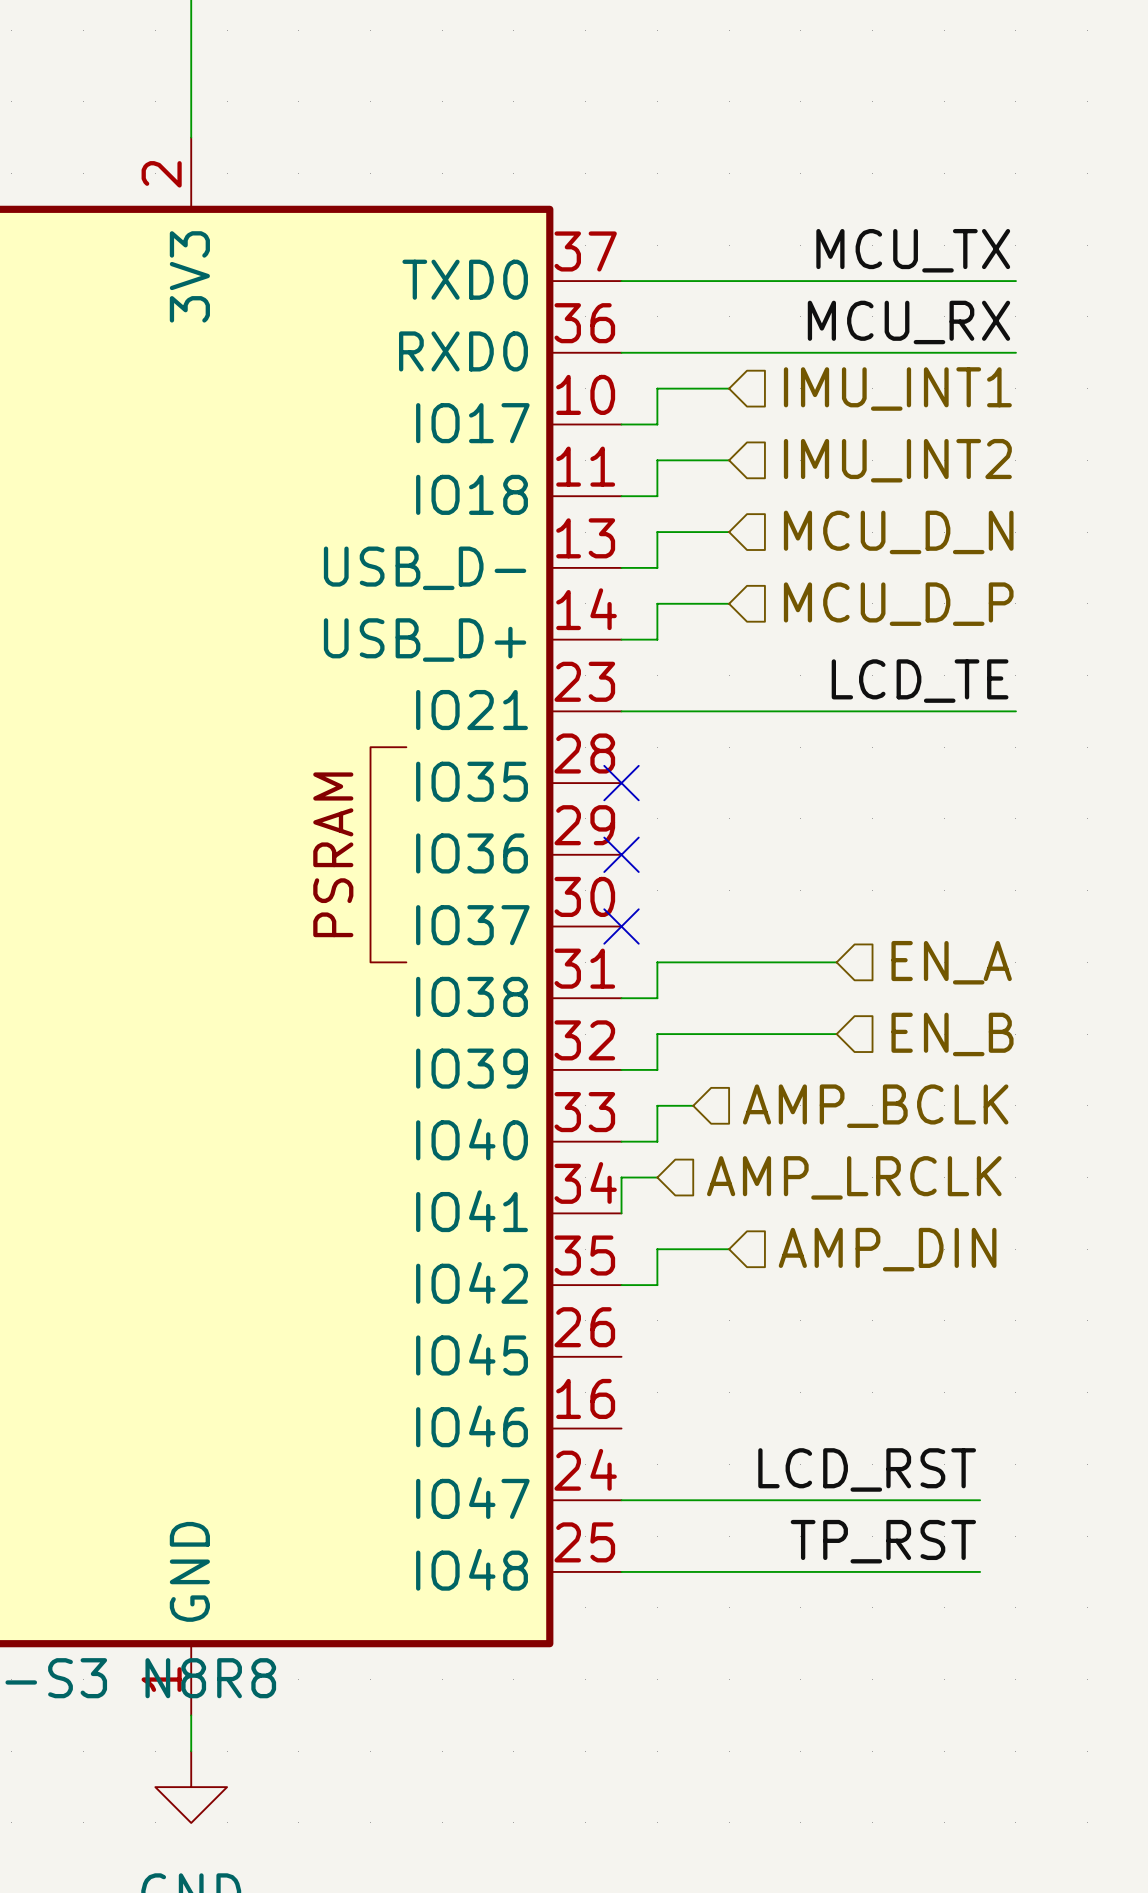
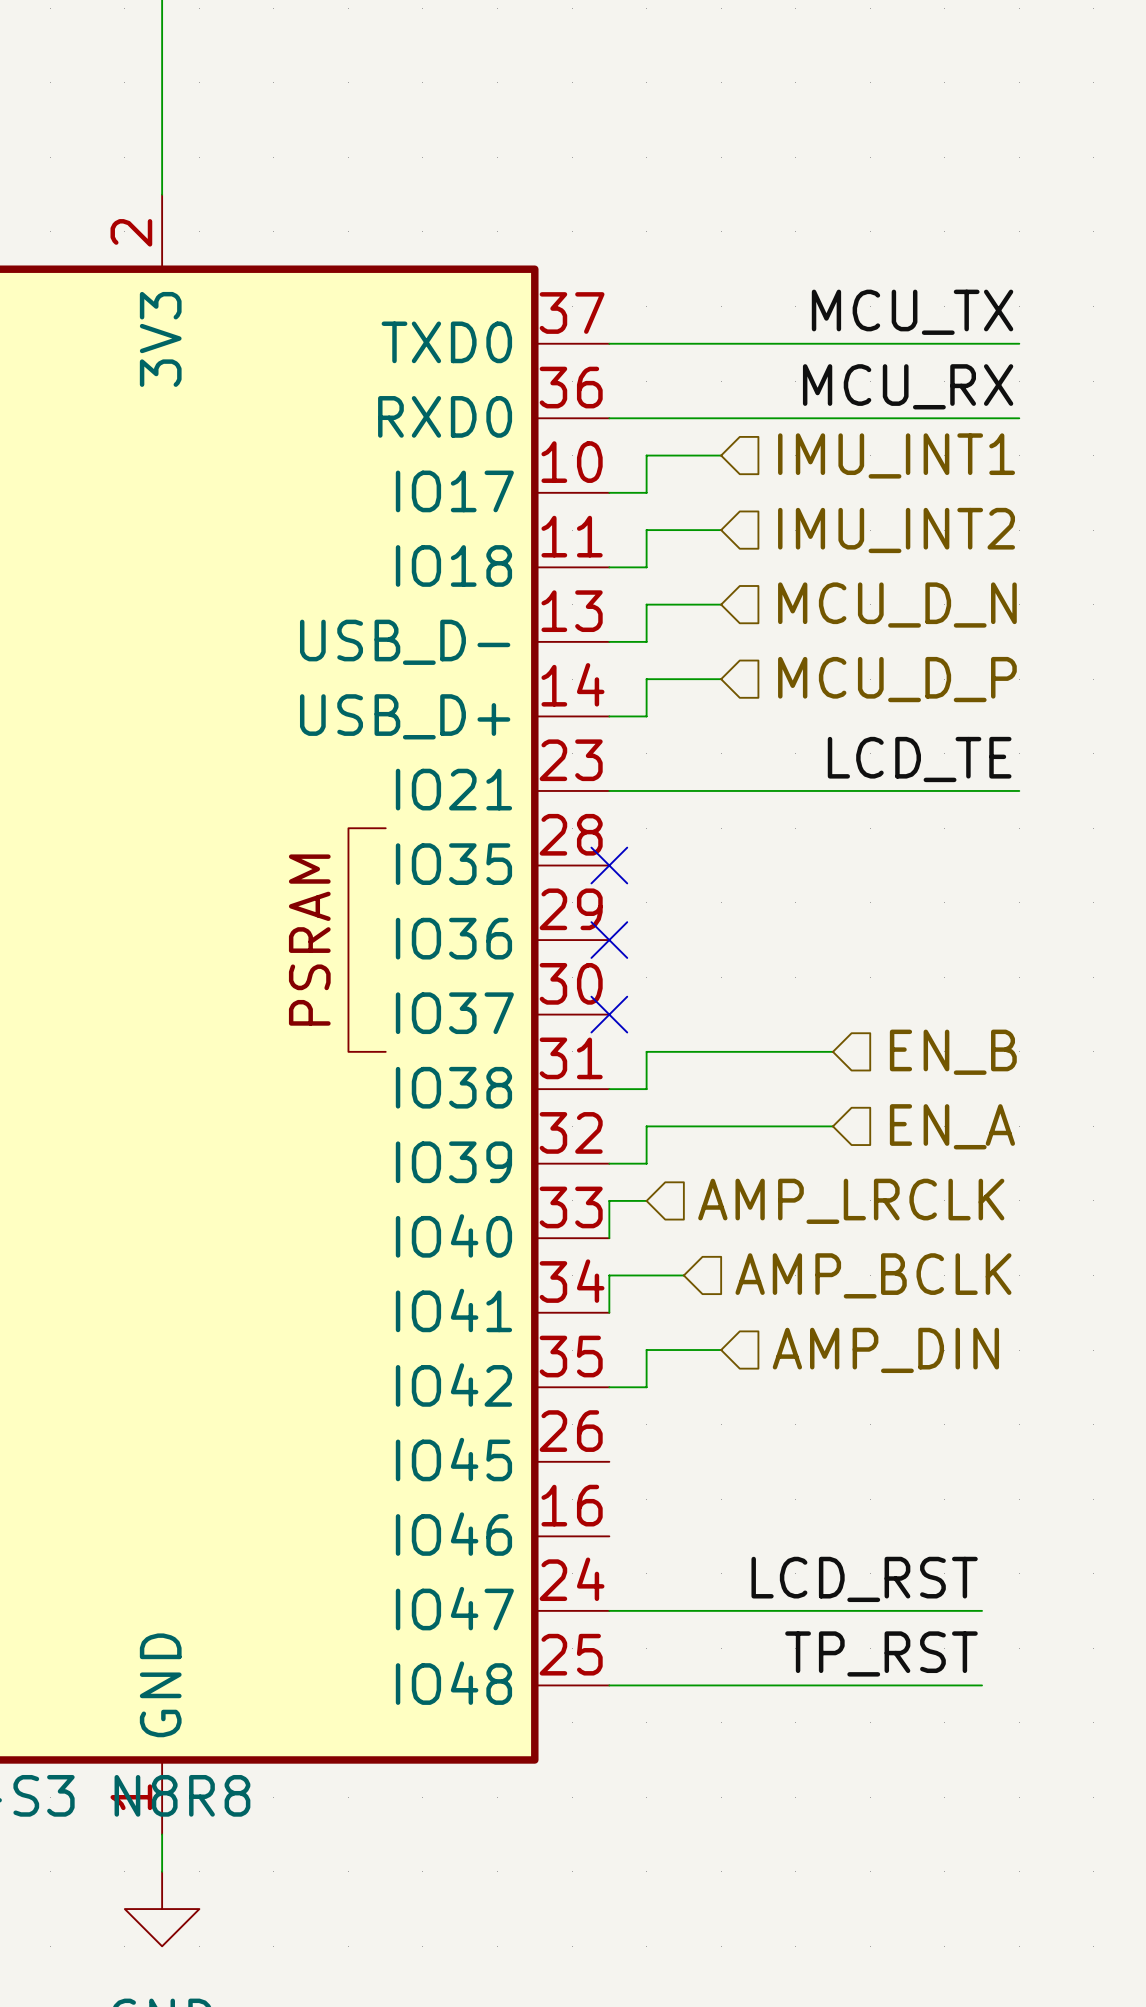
hierarchical label: EN_A (951, 962) -> EN_B (953, 1052)
hierarchical label: EN_B (952, 1034) -> EN_A (952, 1126)
wire: (693, 1105) (657, 1105) (657, 1141) (621, 1141) -> (646, 1200) (609, 1200) (609, 1238)
hierarchical label position: AMP_BCLK (875, 1106) -> AMP_BCLK (873, 1275)
wire: none -> (646, 1275) (683, 1275)
hierarchical label position: AMP_LRCLK (854, 1177) -> AMP_LRCLK (851, 1201)

